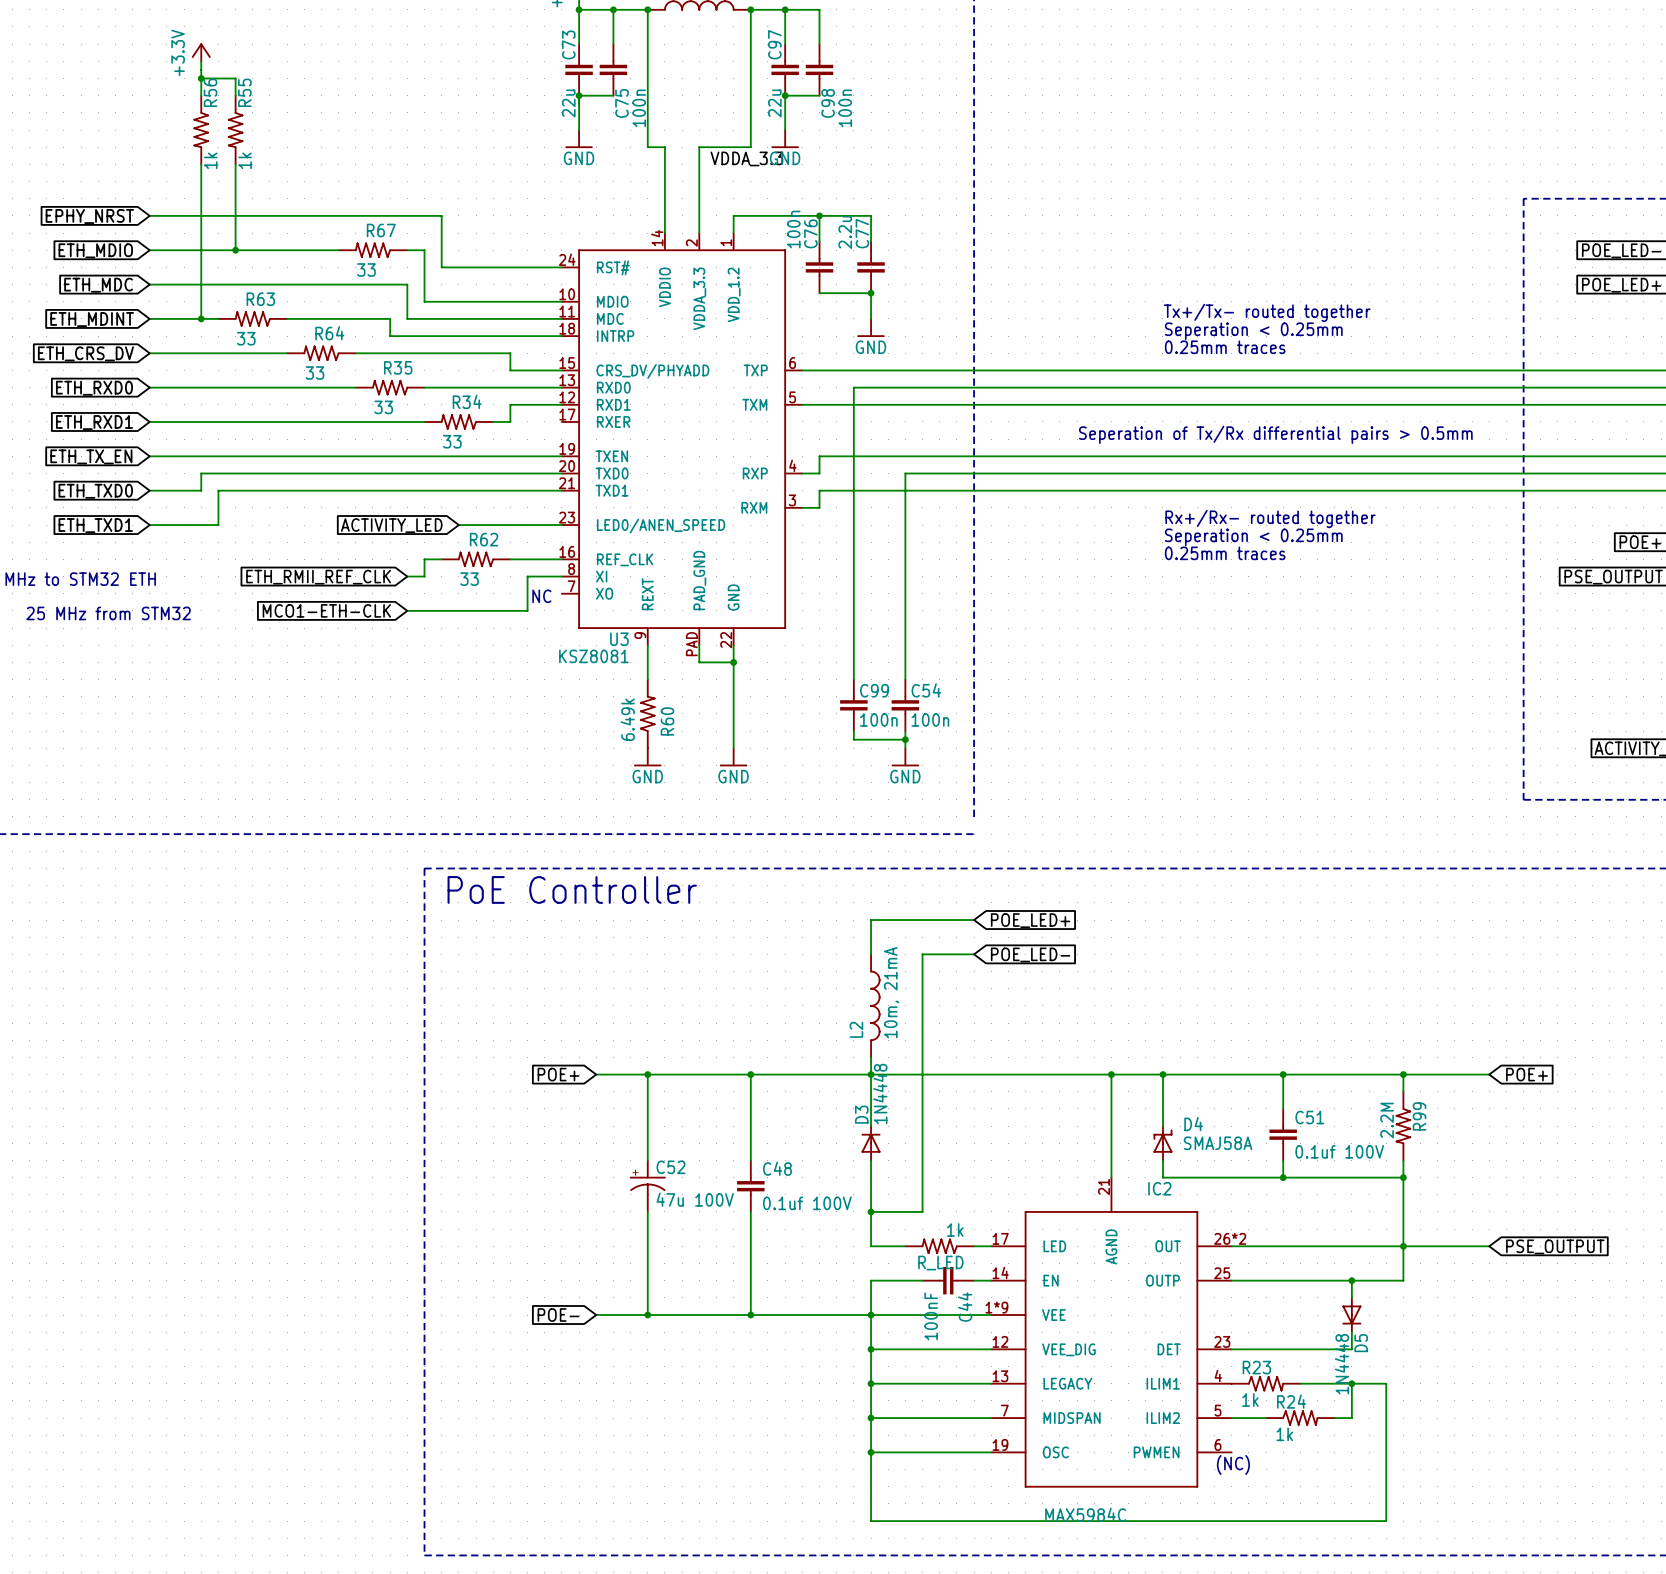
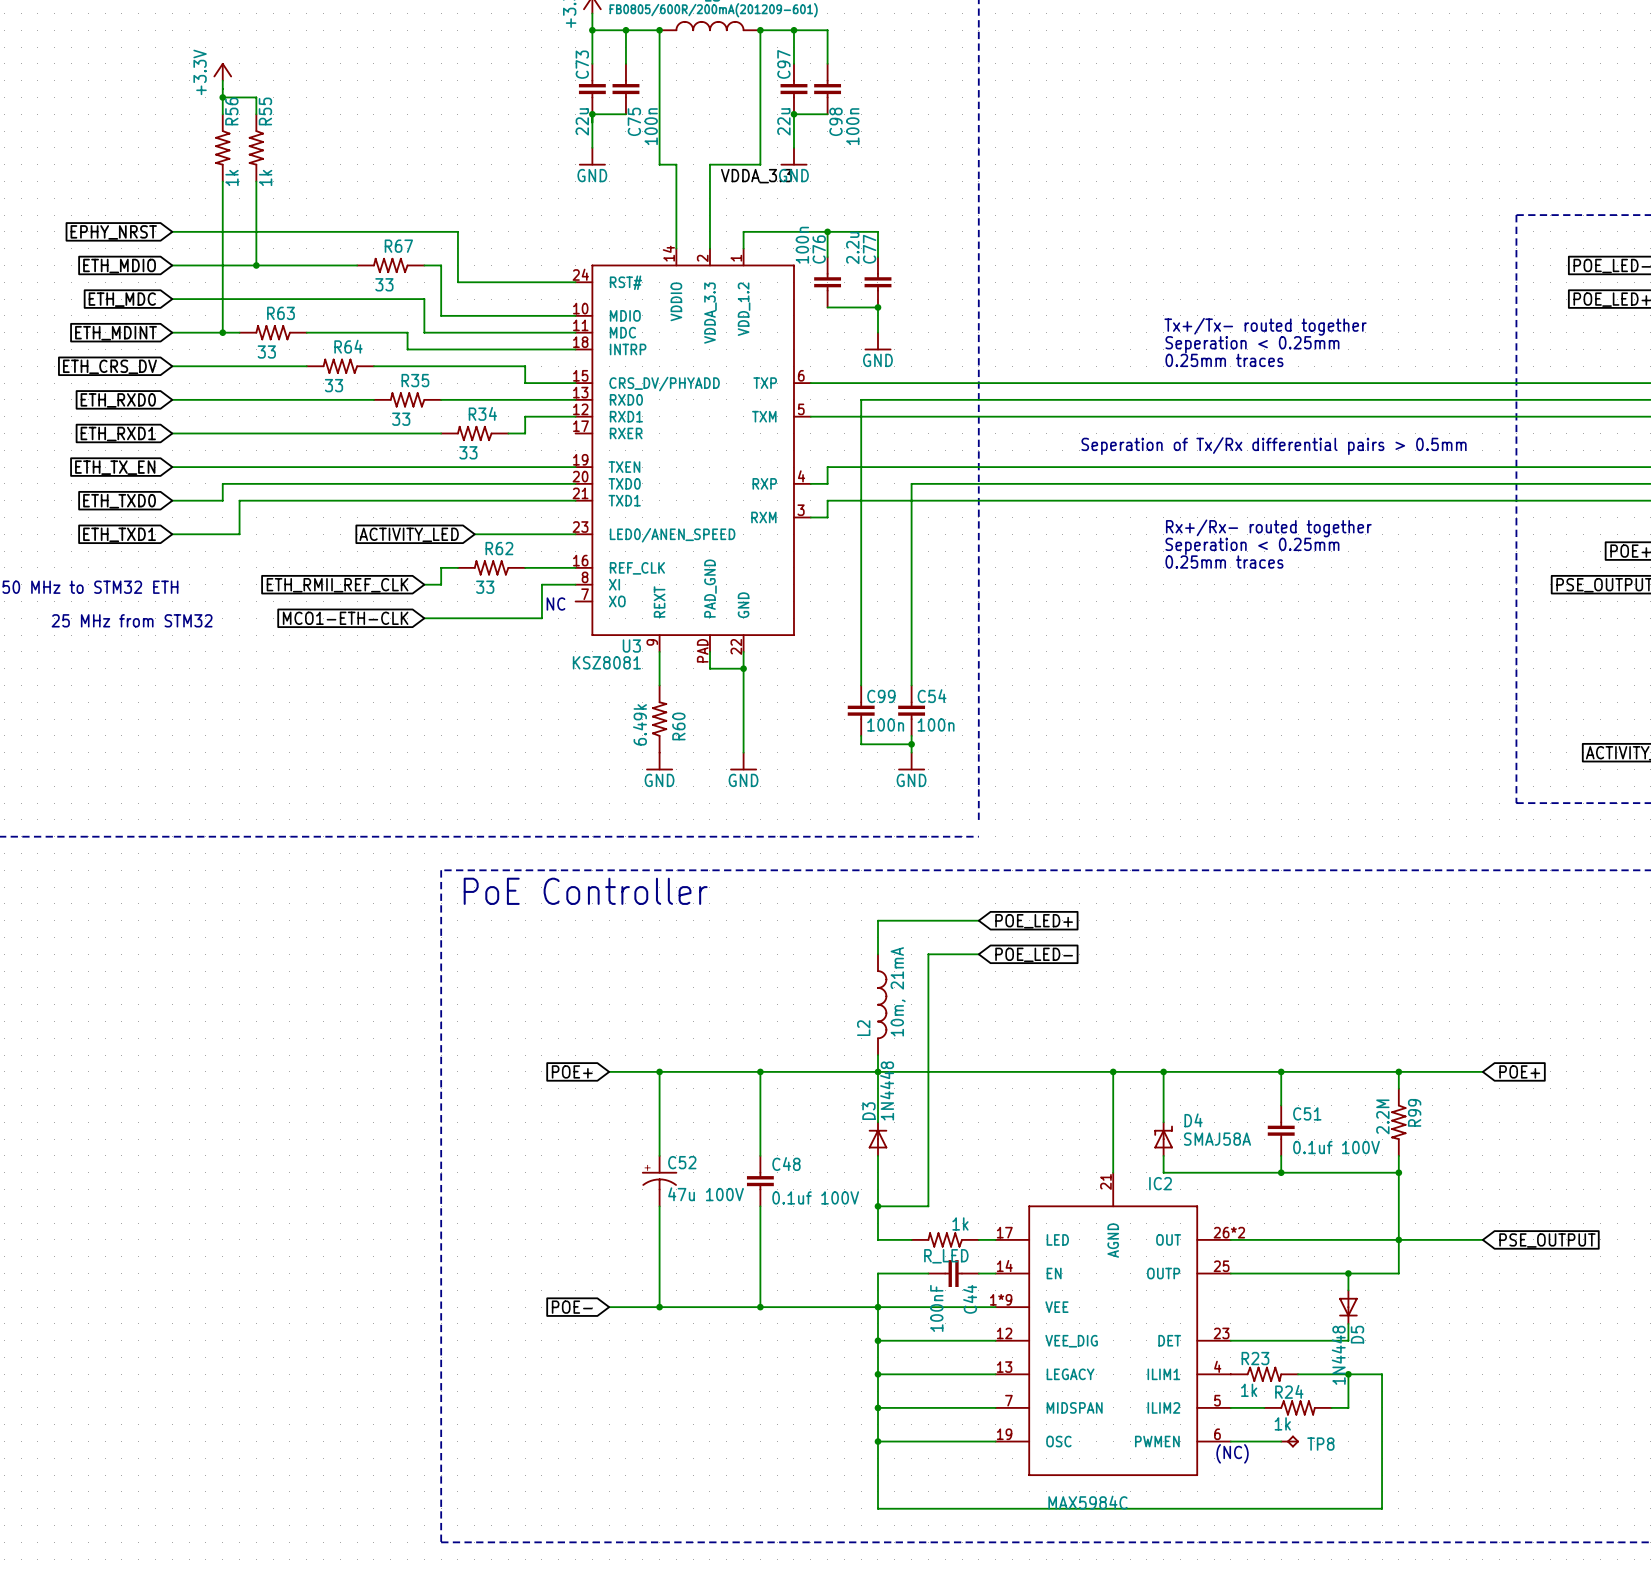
wire: none -> (1230, 1441) (1281, 1441)
TP8: none -> (1290, 1441)

